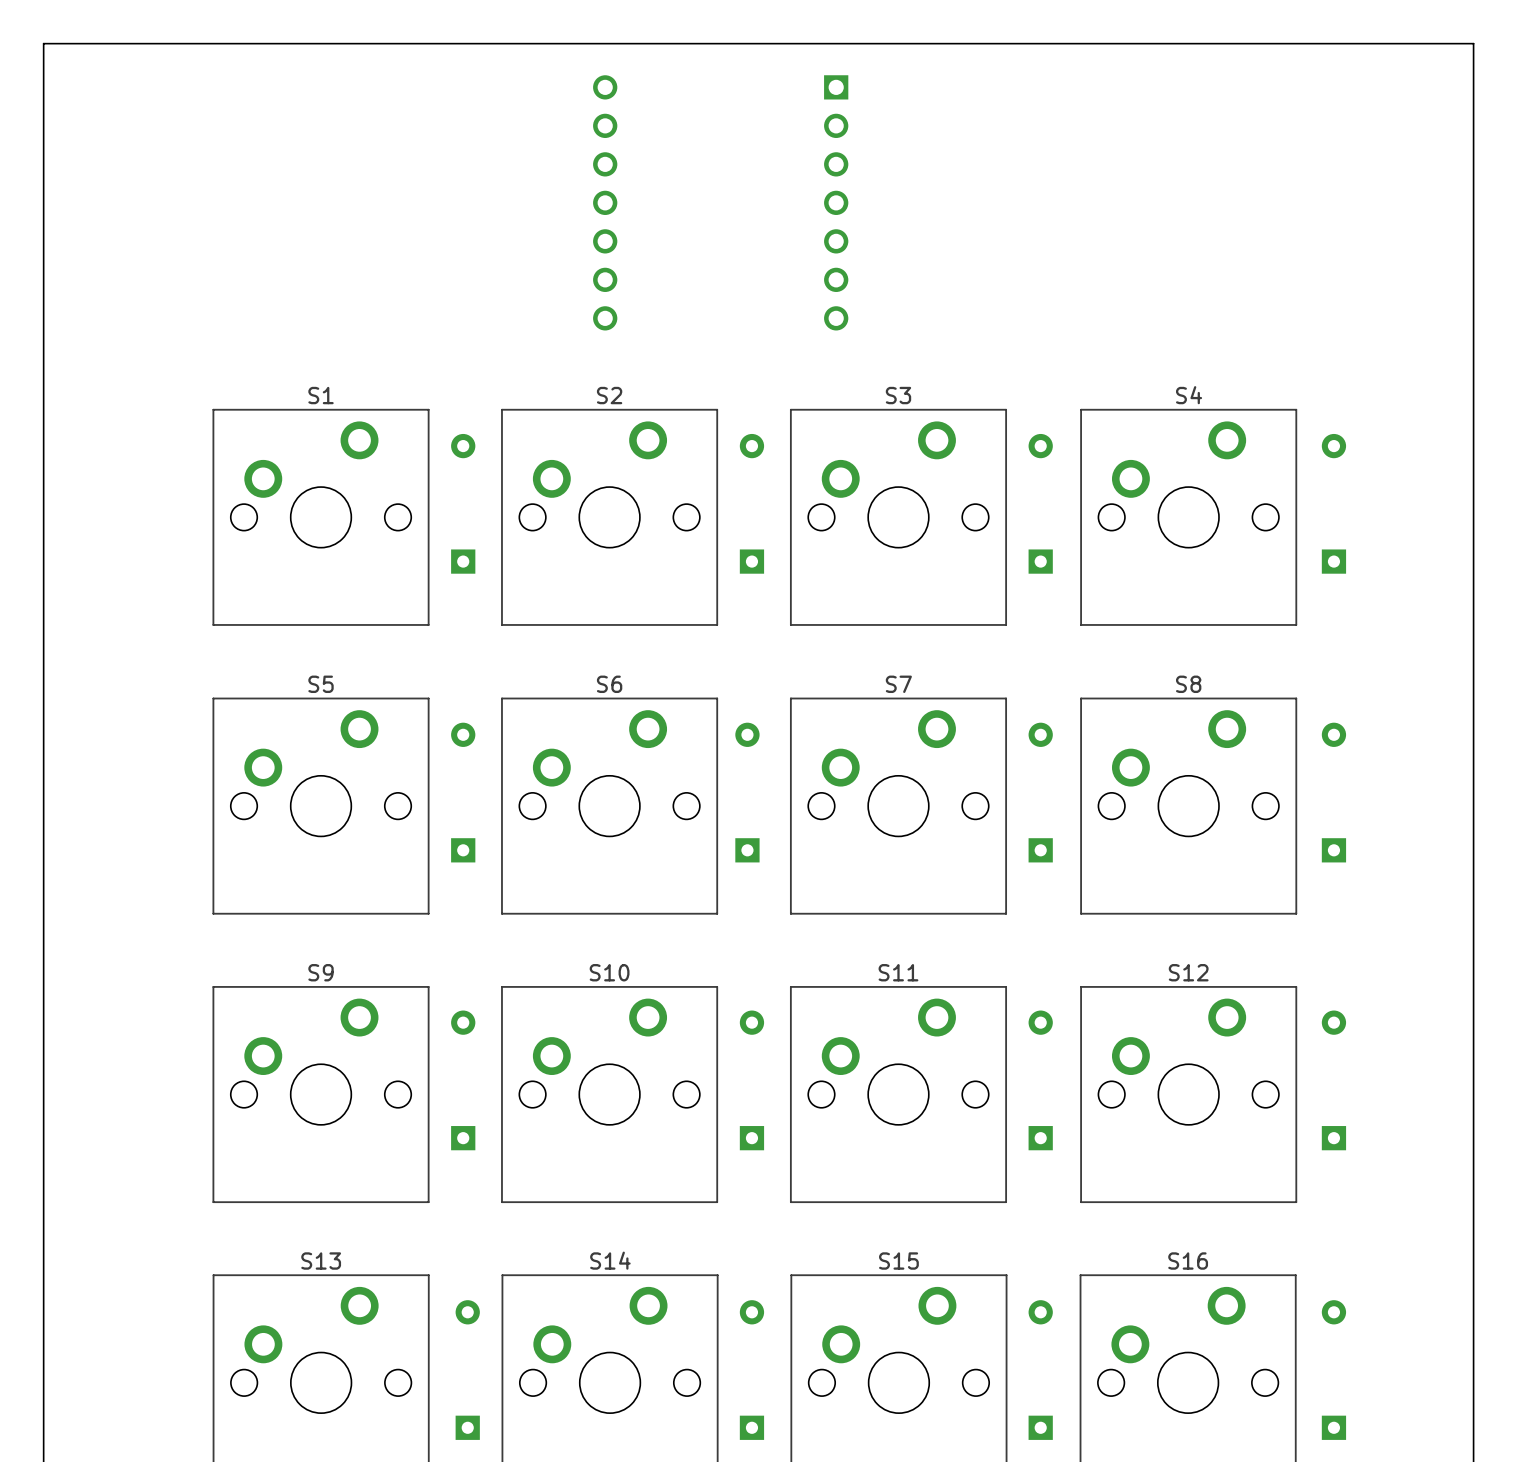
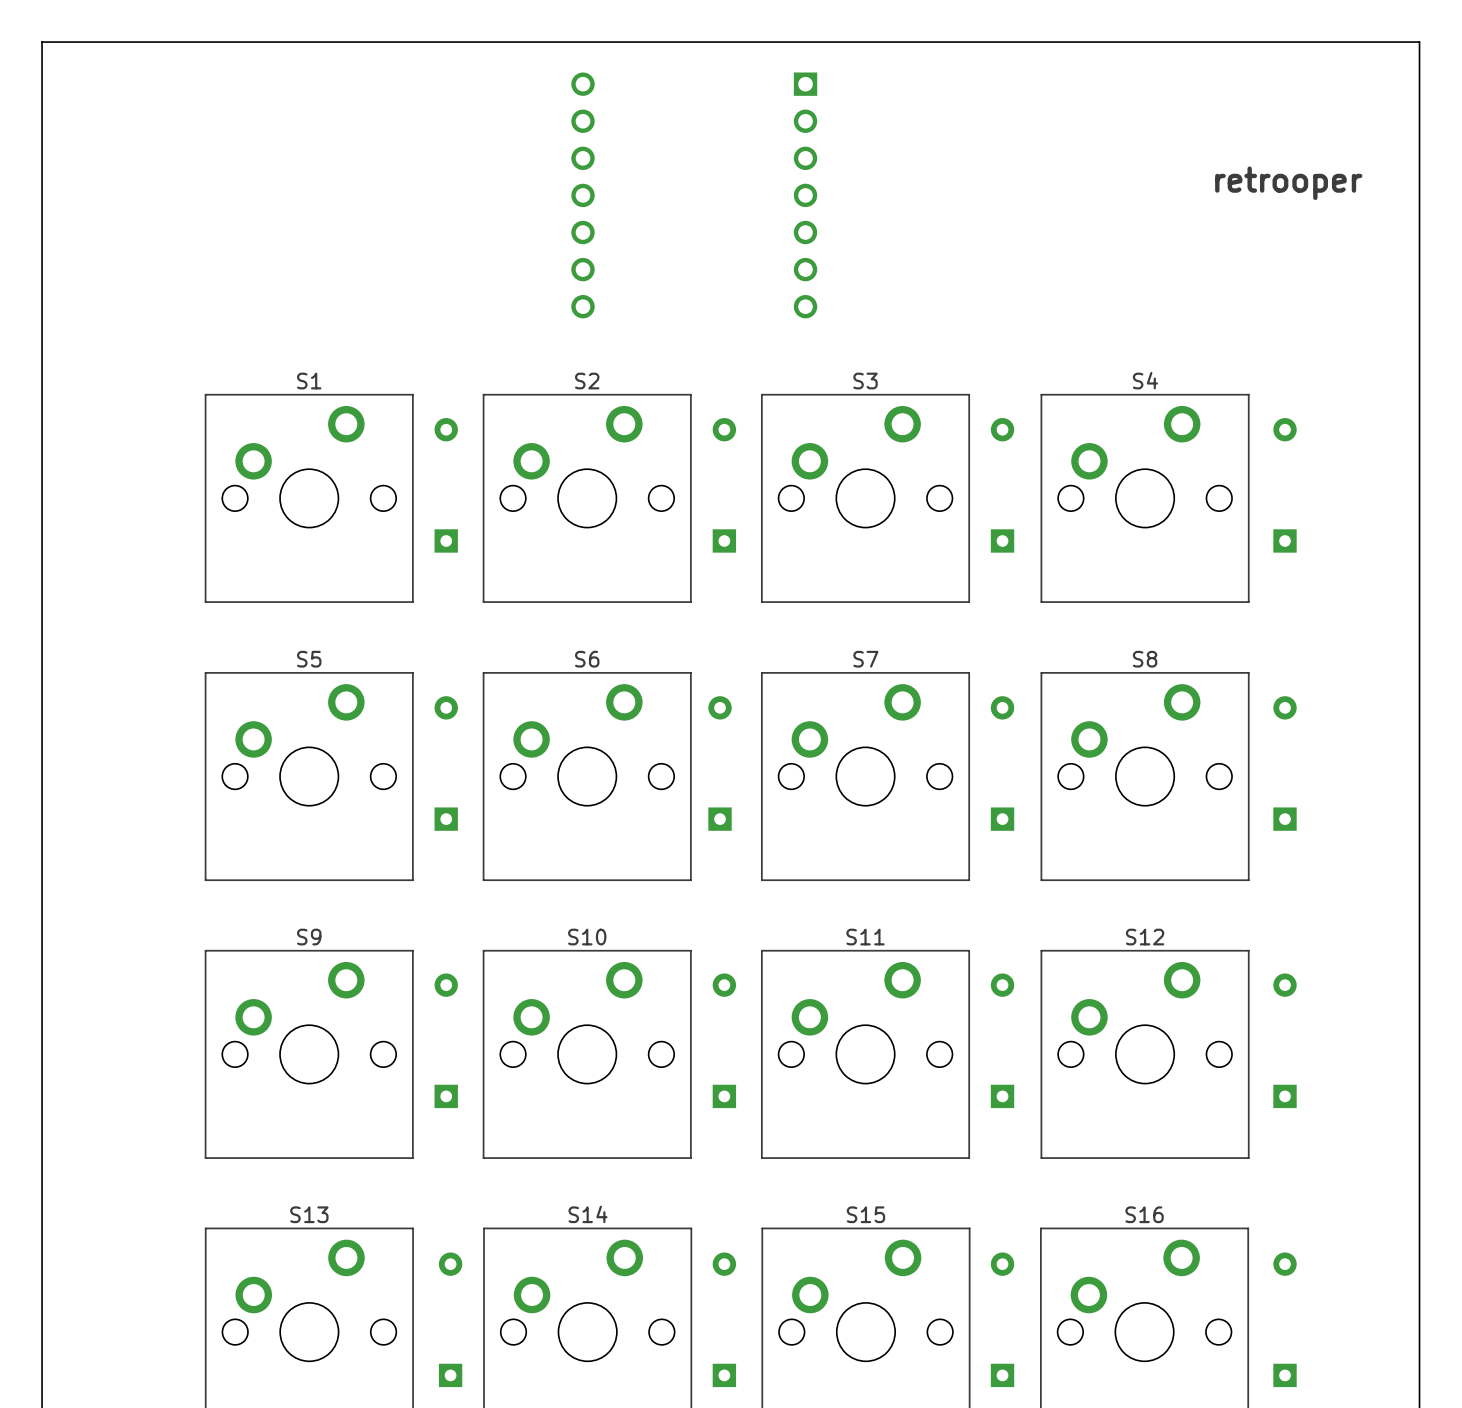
text: none -> retrooper (1288, 183)

